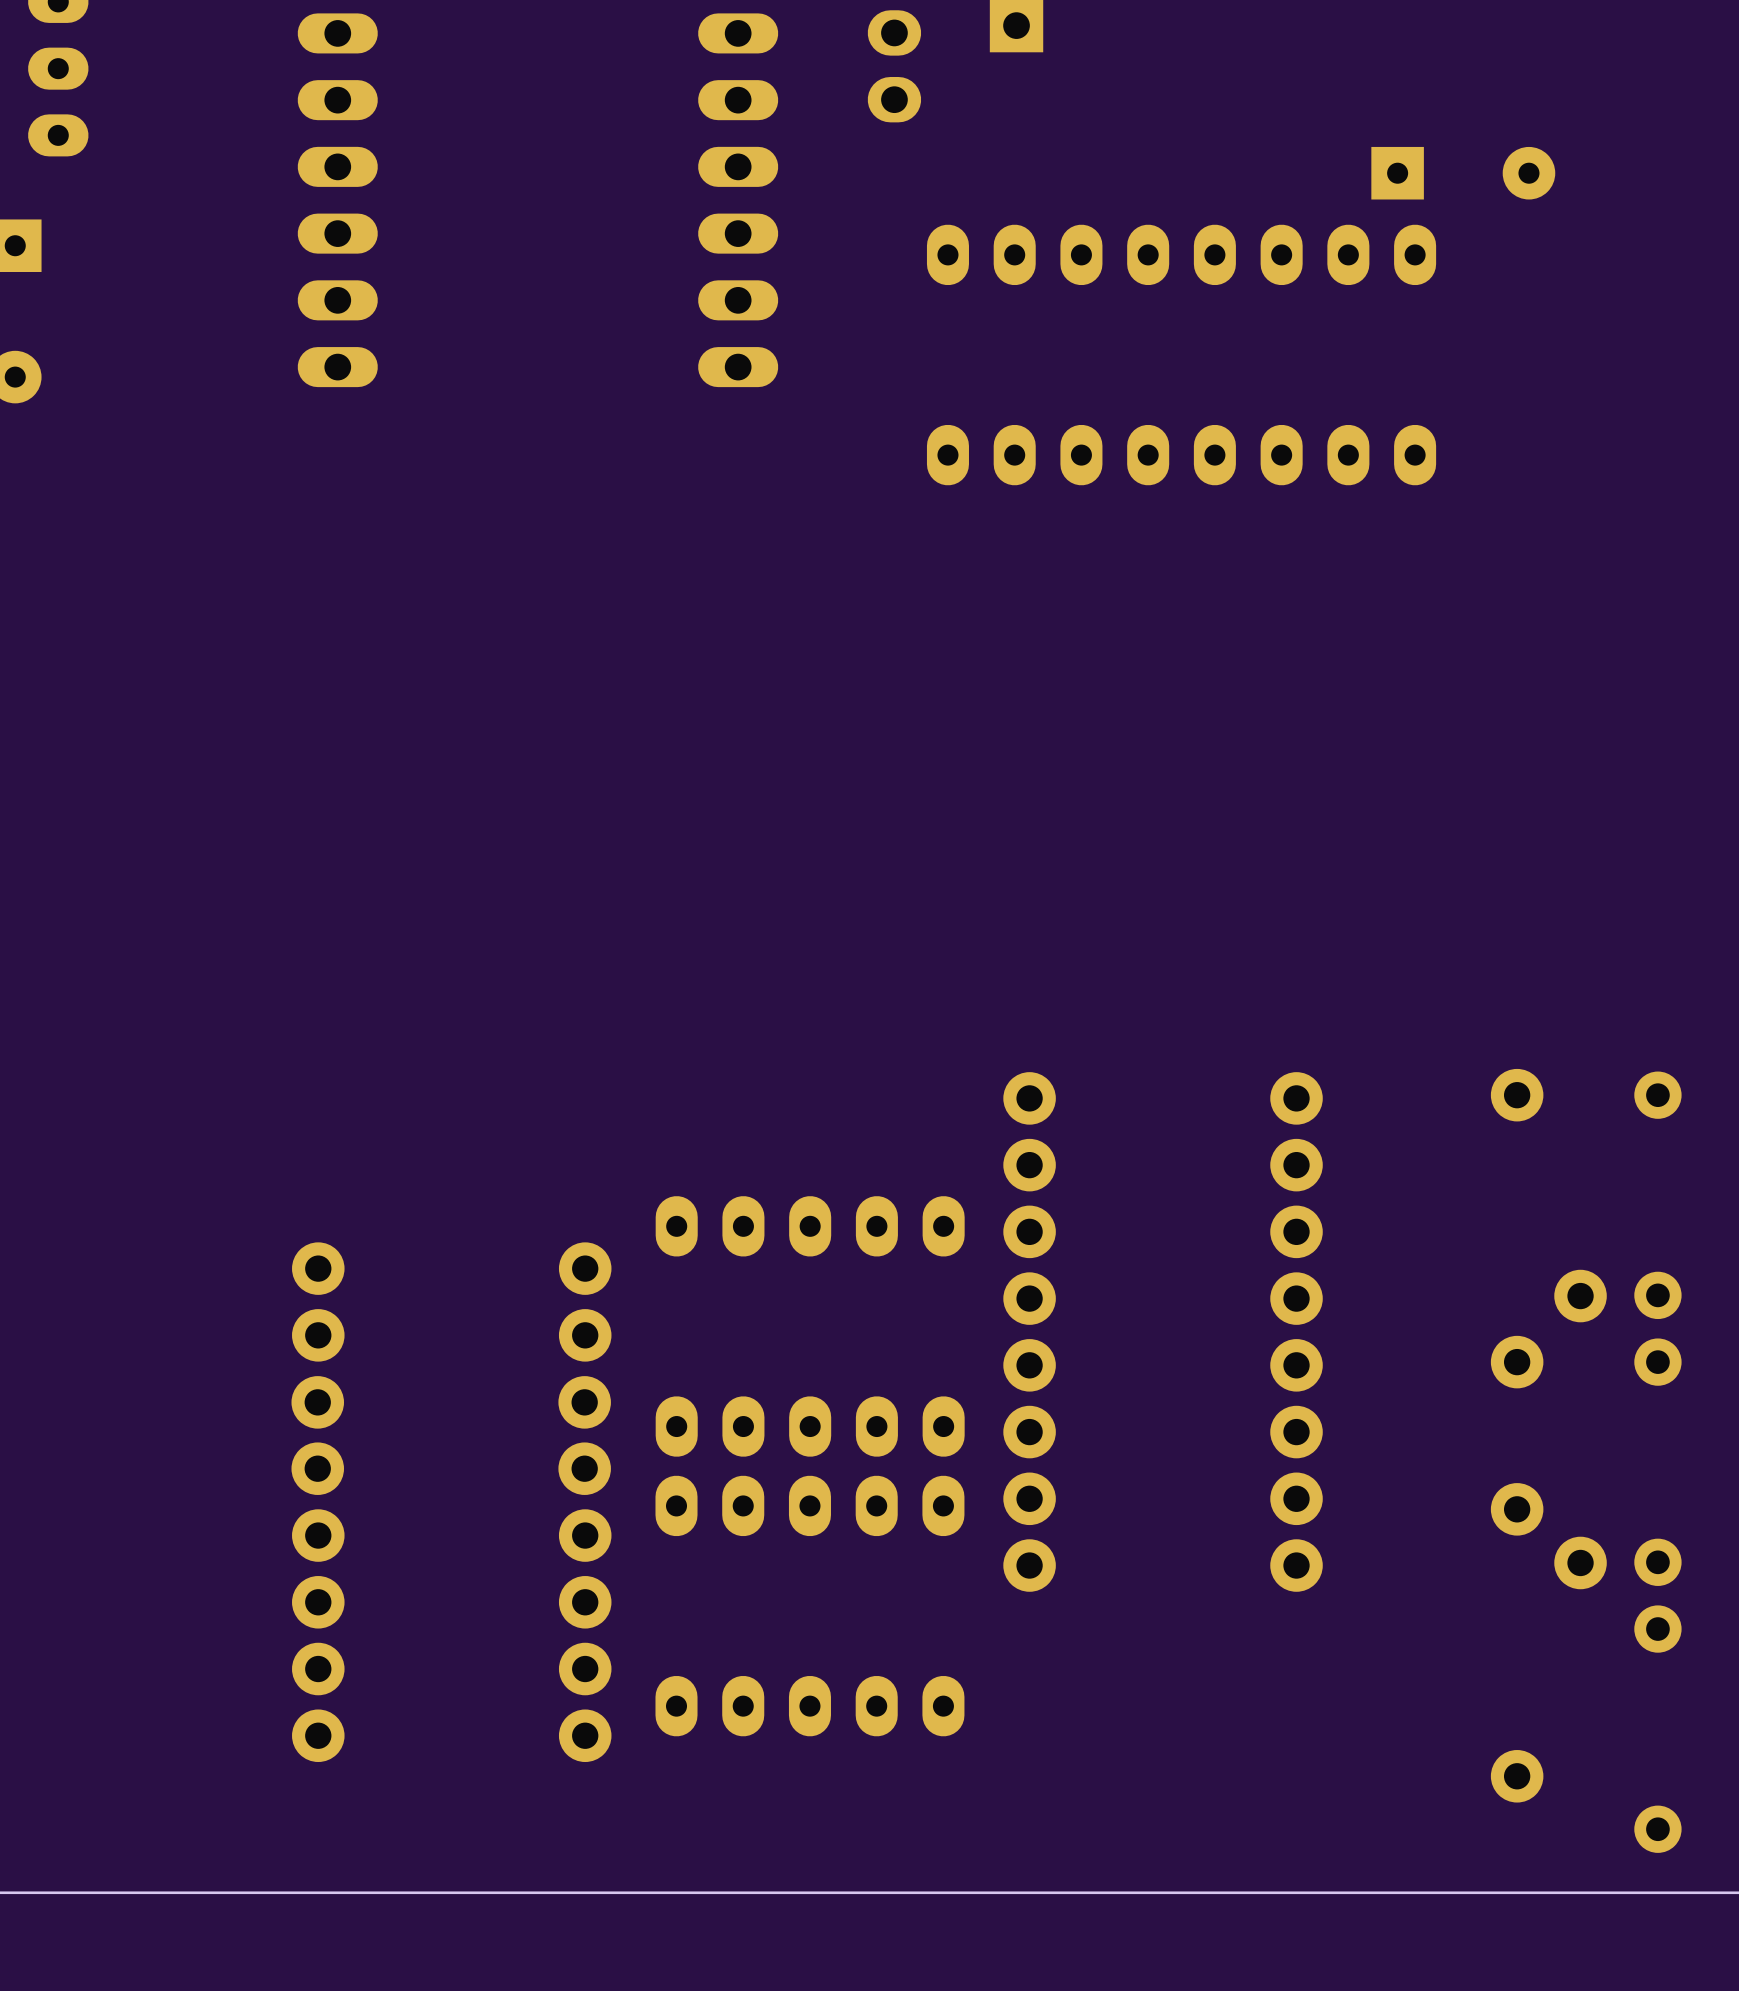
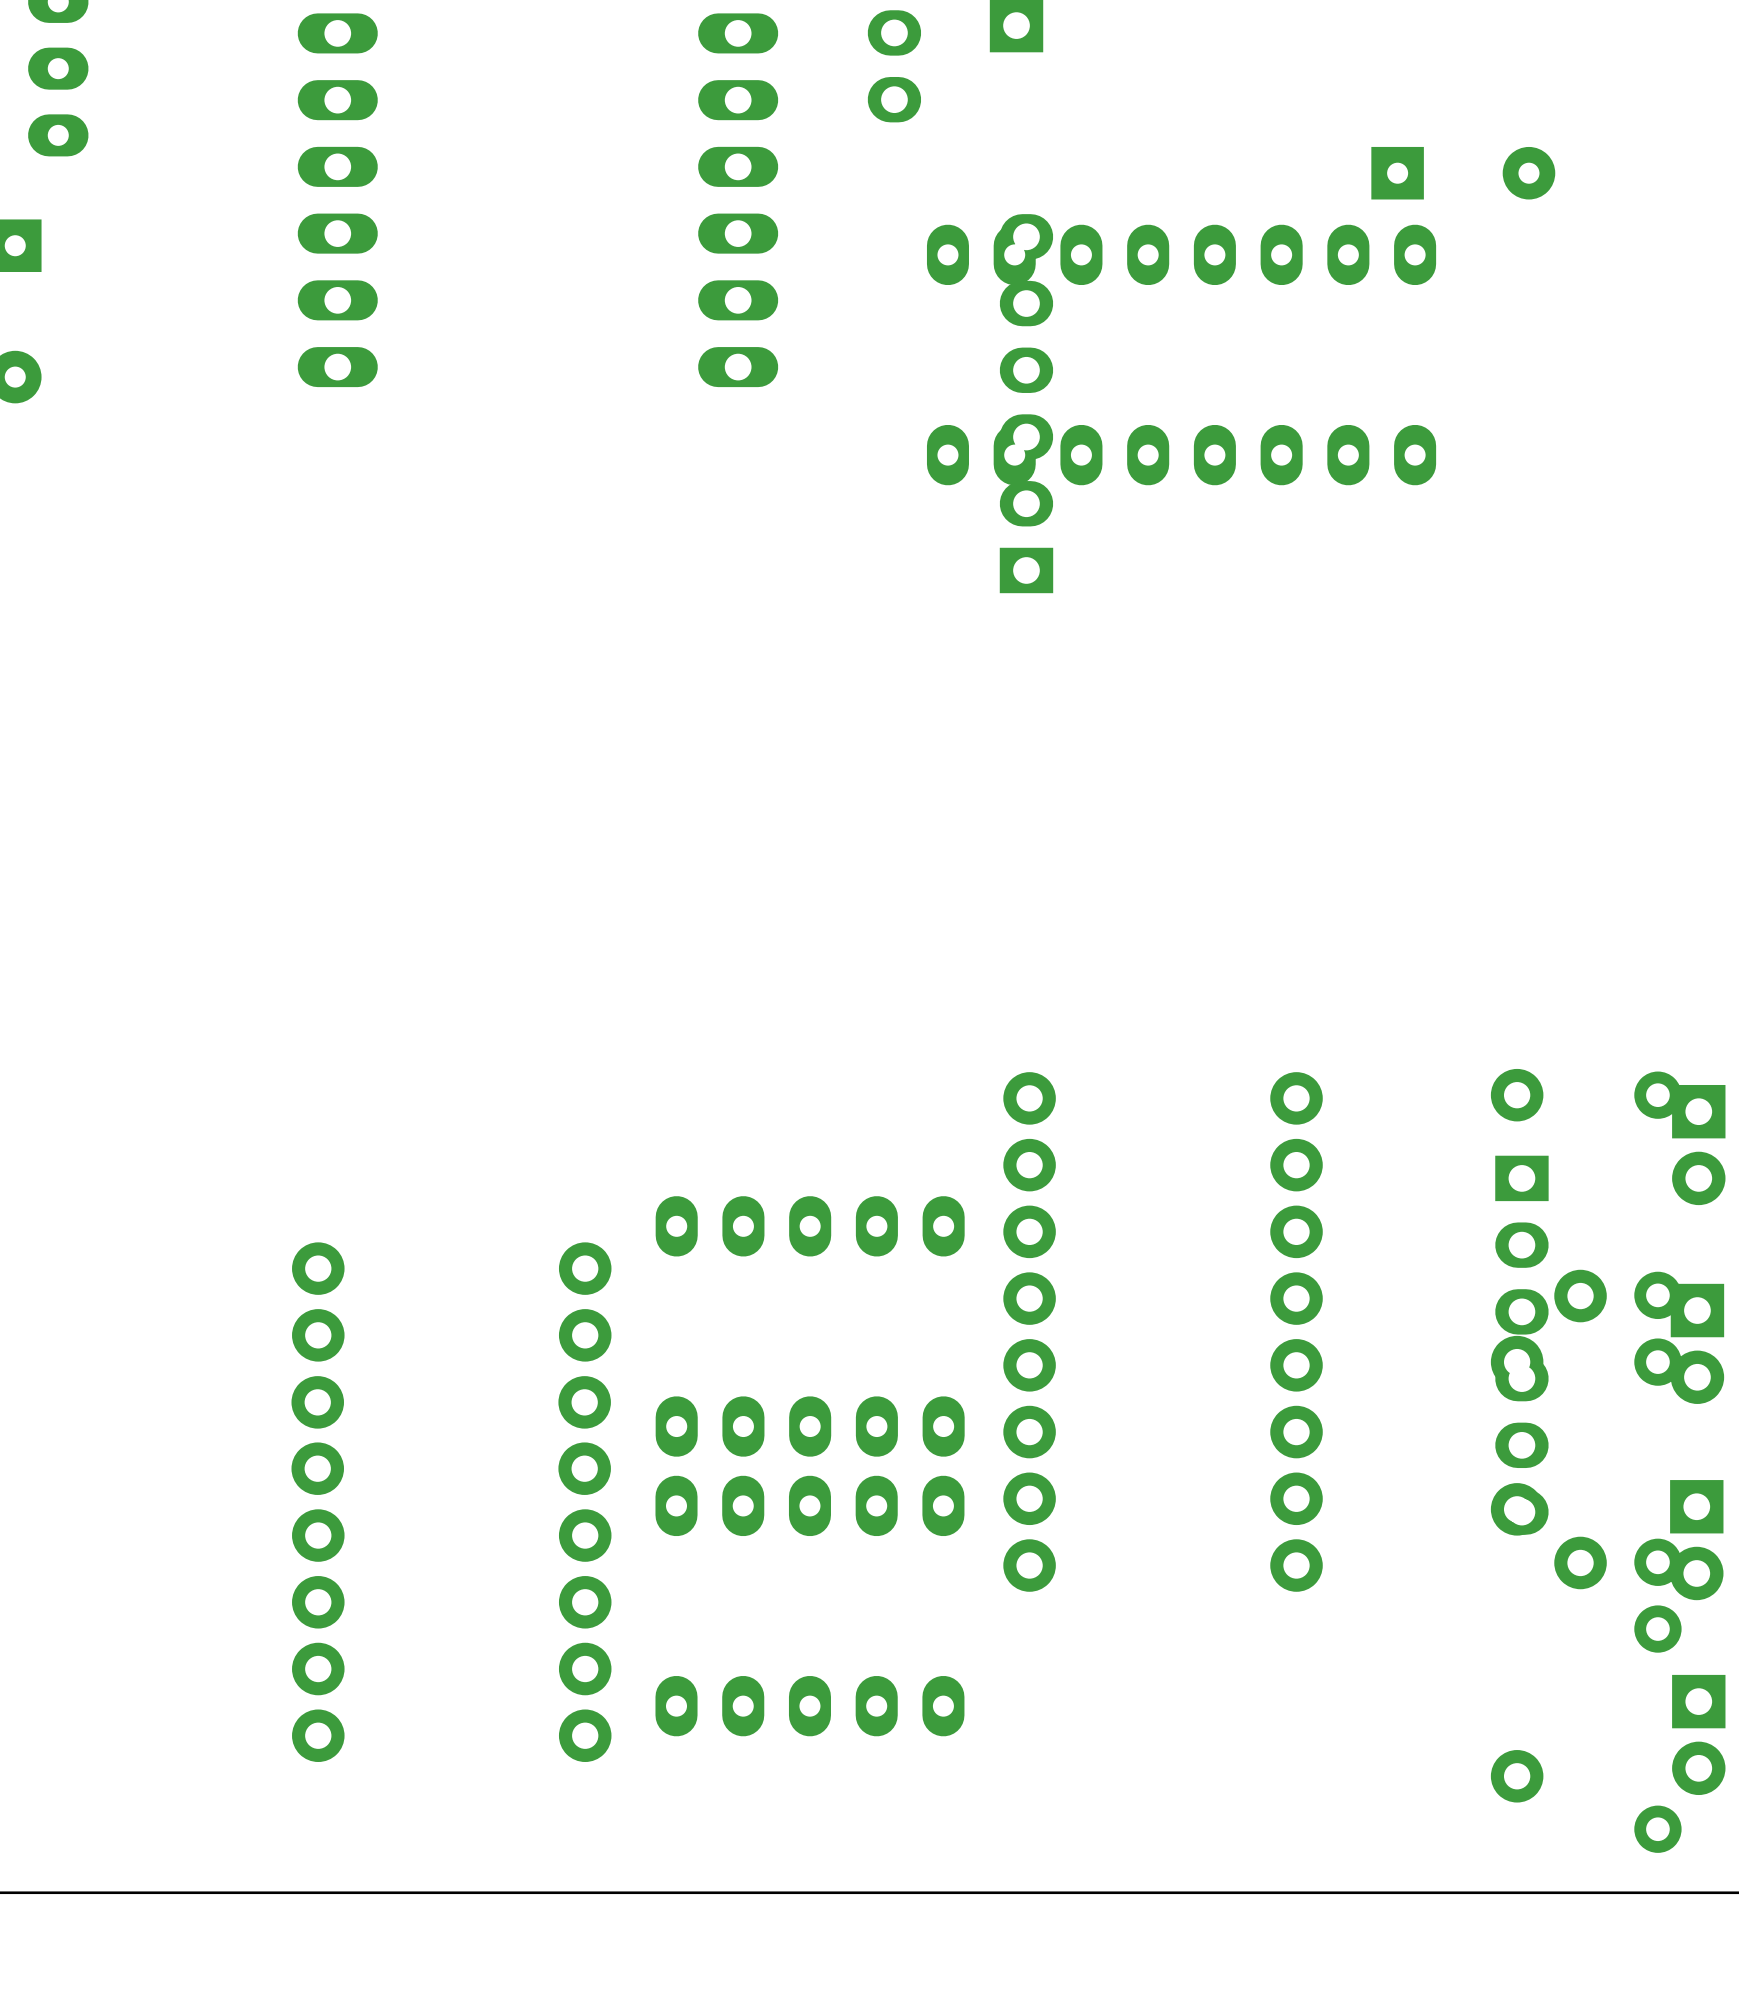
part: none -> (1026, 403)
part: none -> (1698, 1145)
part: none -> (1697, 1343)
part: none -> (1521, 1345)
part: none -> (1696, 1540)
part: none -> (1698, 1734)

